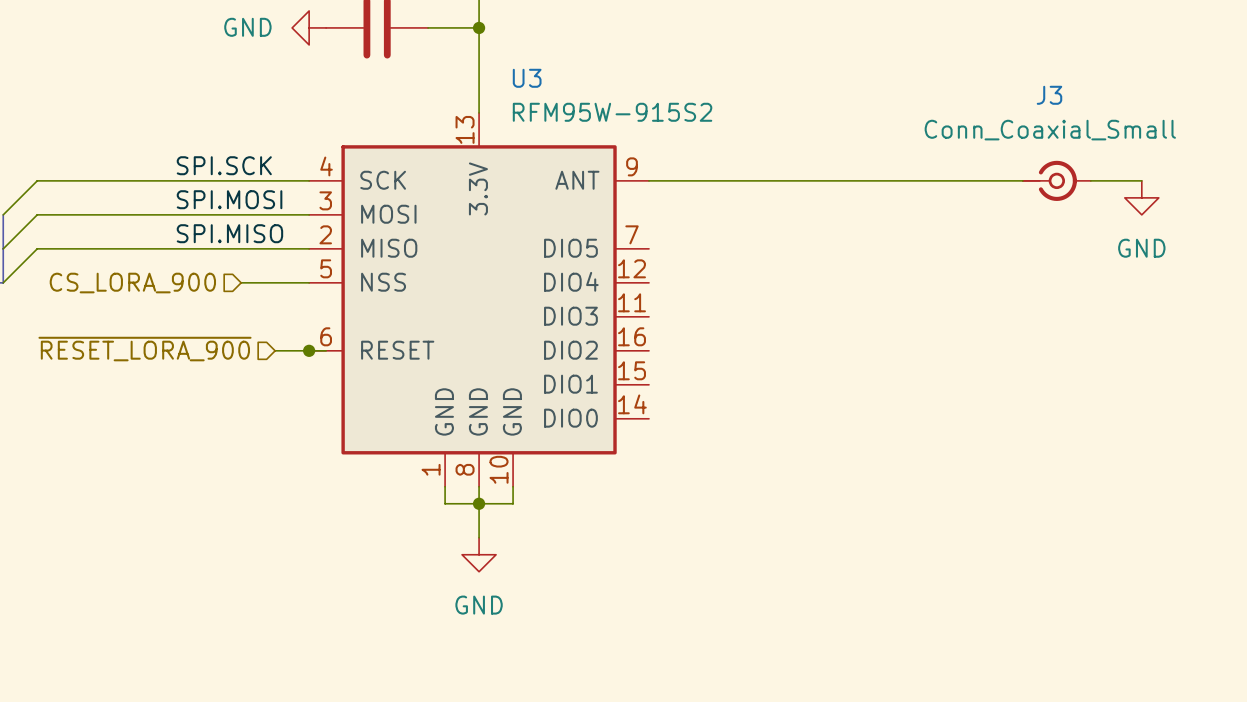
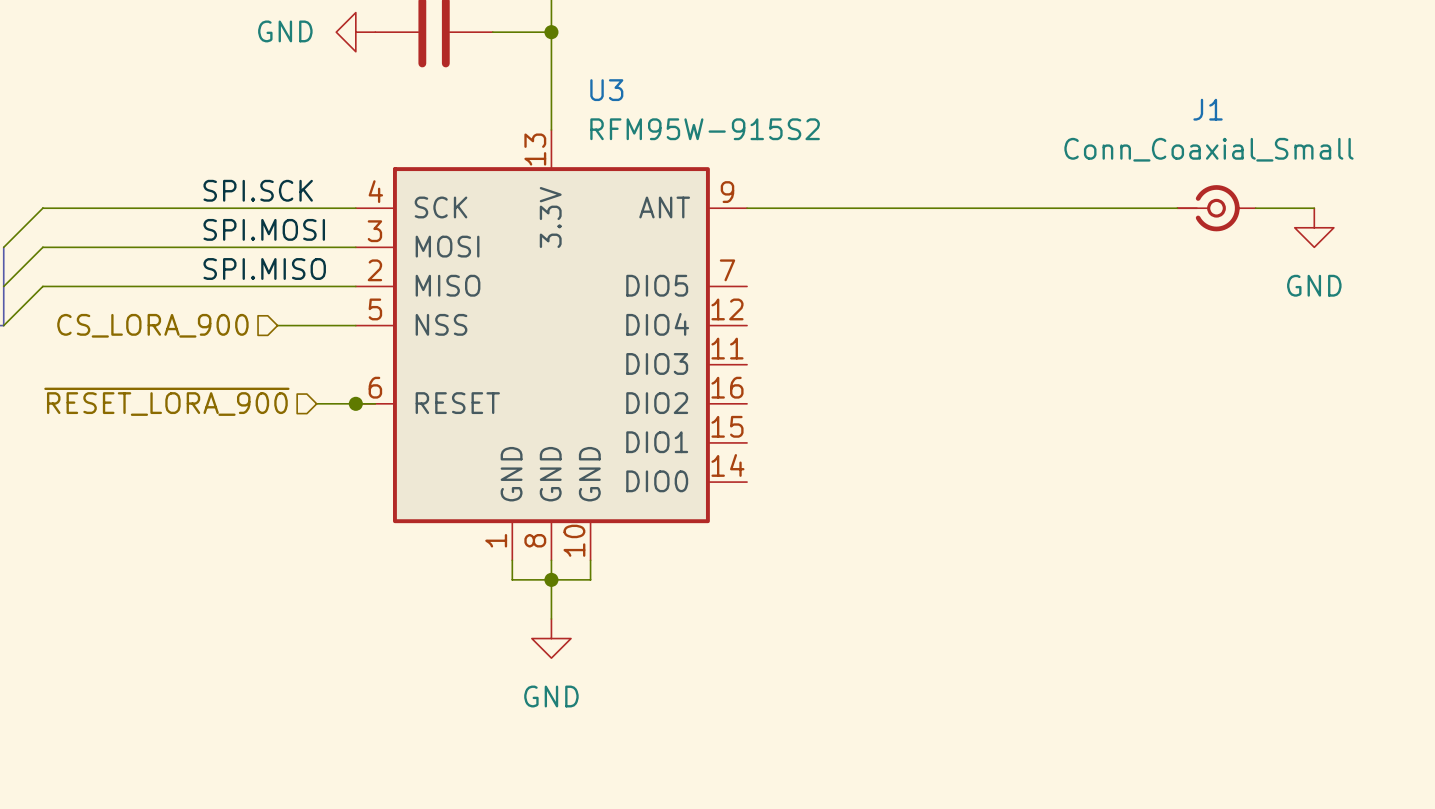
J3 name: J3 (1049, 95) -> J1 (1208, 109)

